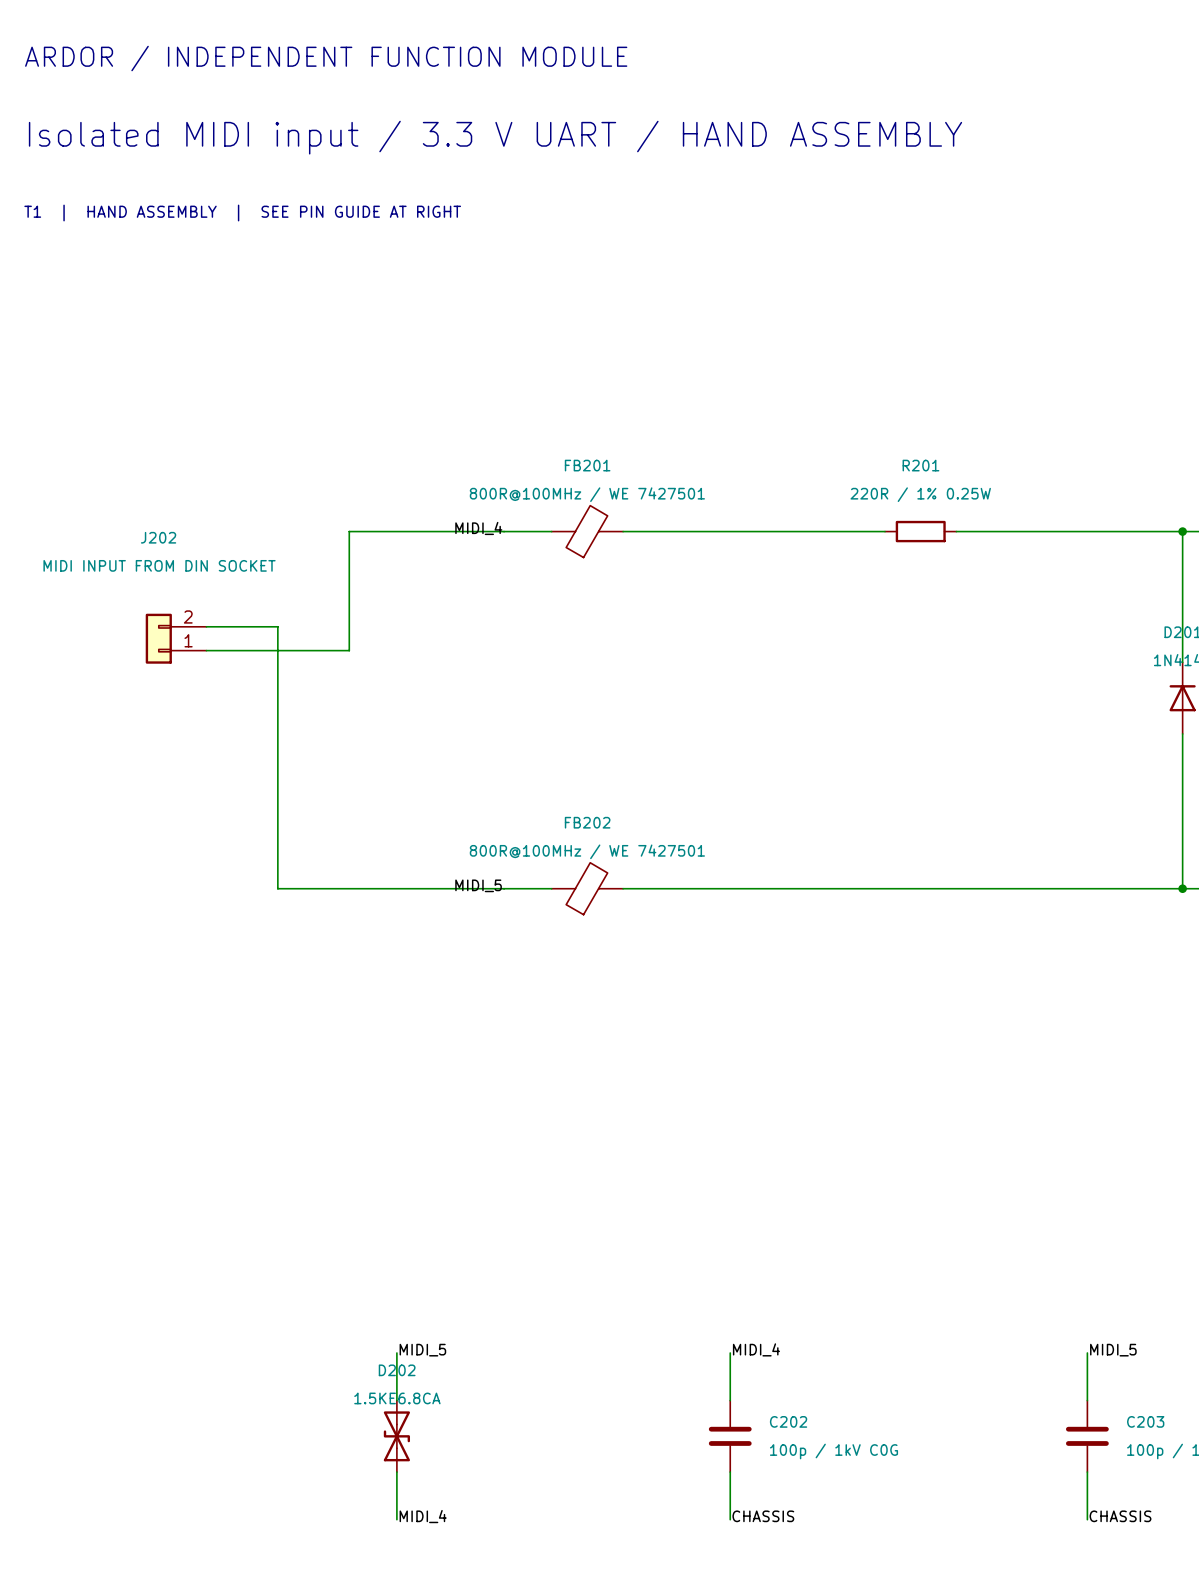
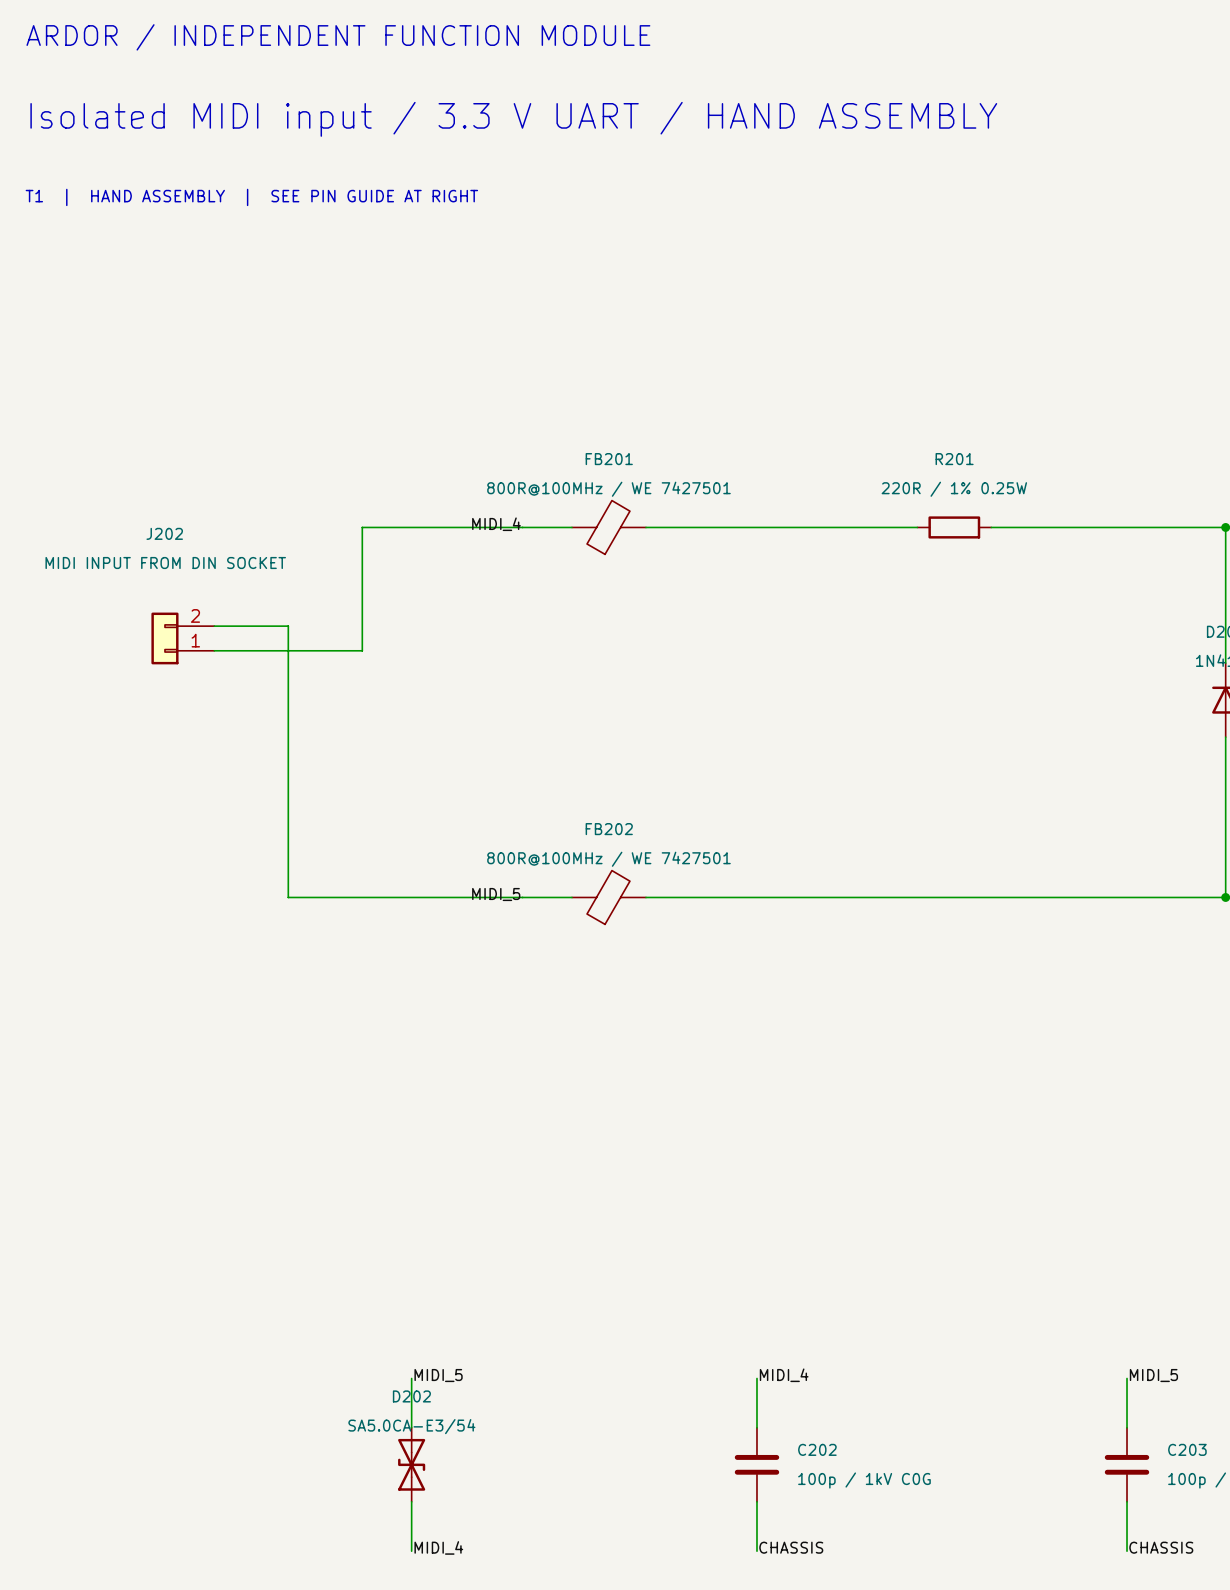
D202 value: 1.5KE6.8CA (397, 1398) -> SA5.0CA-E3/54 (411, 1426)

